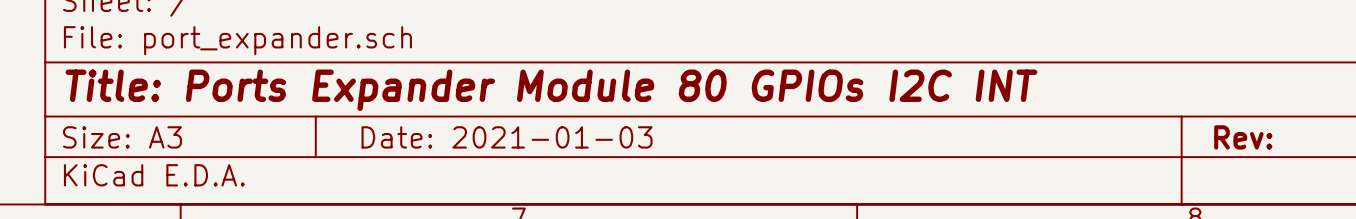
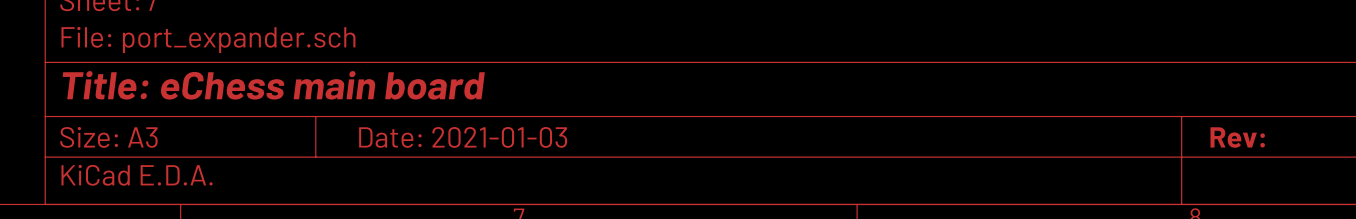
title block: Title: Ports Expander Module 80 GPIOs I2C INT (551, 90) -> Title: eChess main board (273, 85)

